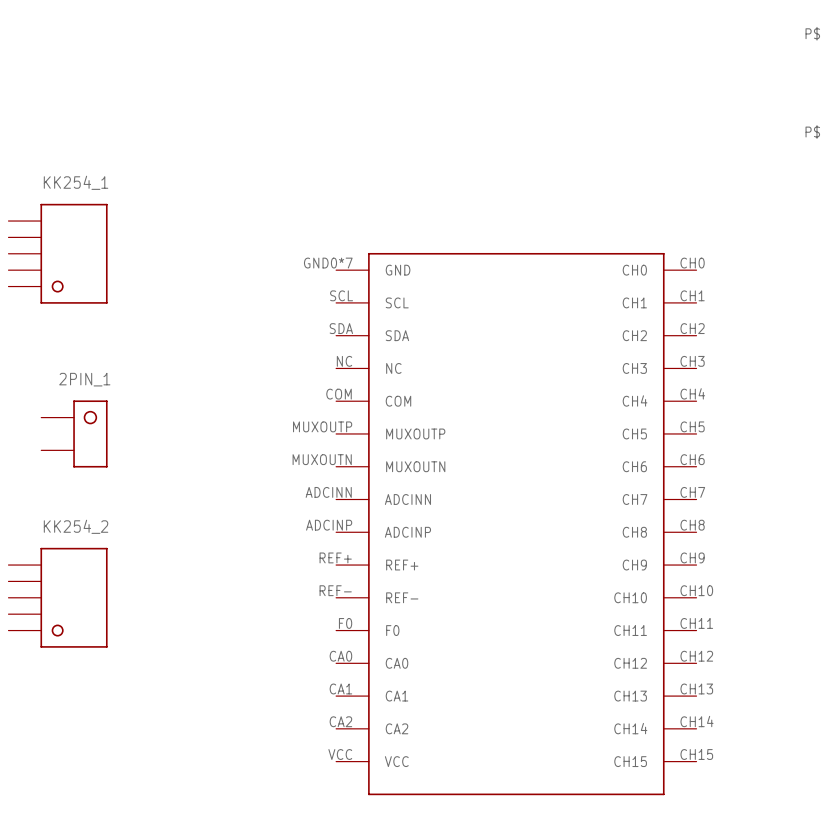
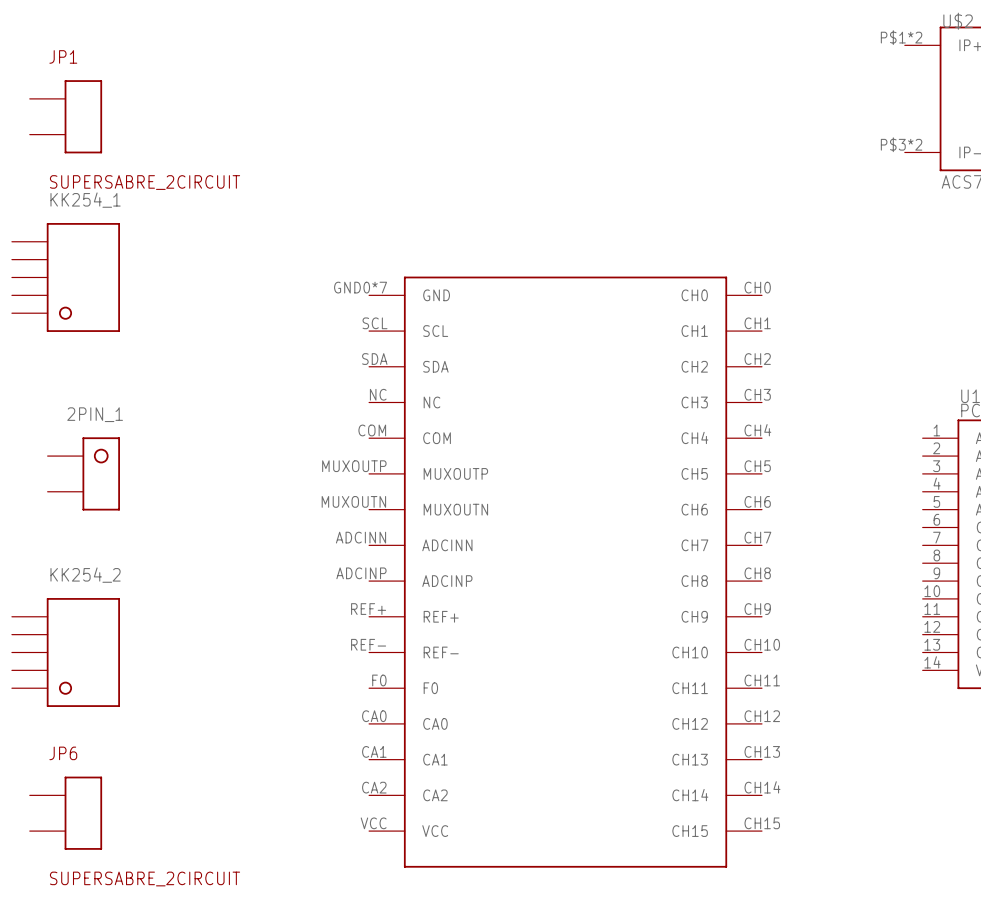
JP1: none -> SUPERSABRE_2CIRCUIT (65, 116)
JP6: none -> SUPERSABRE_2CIRCUIT (65, 813)

